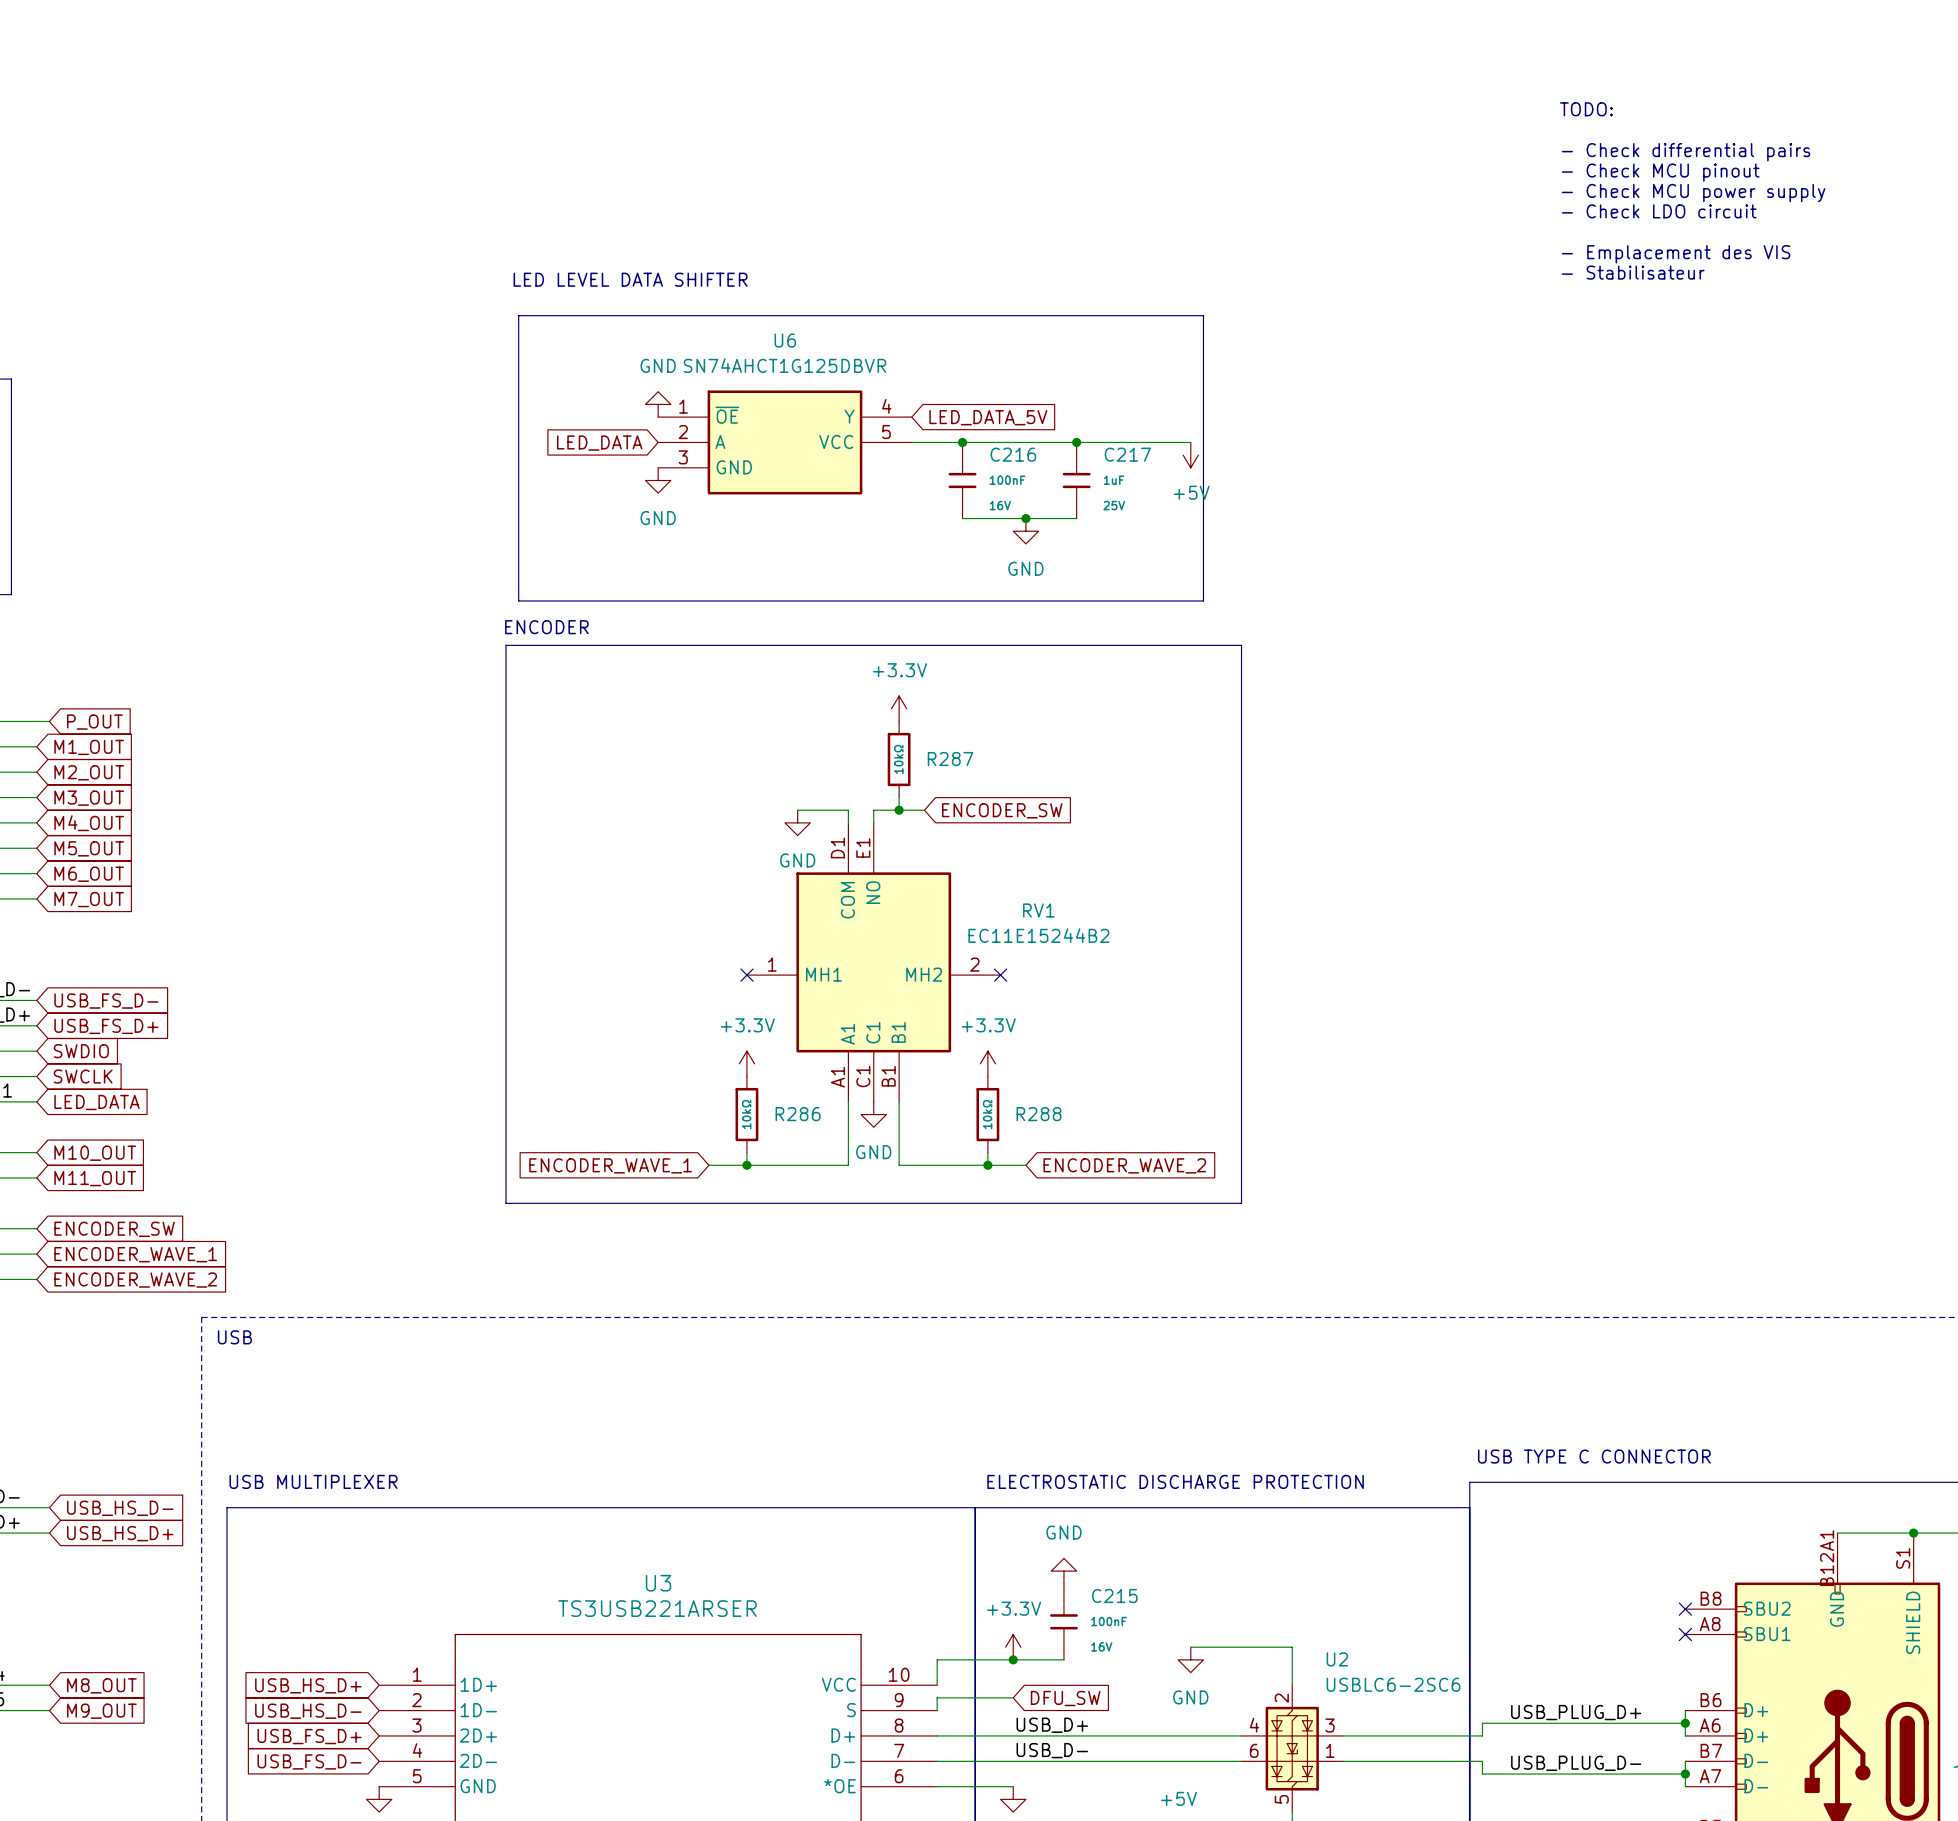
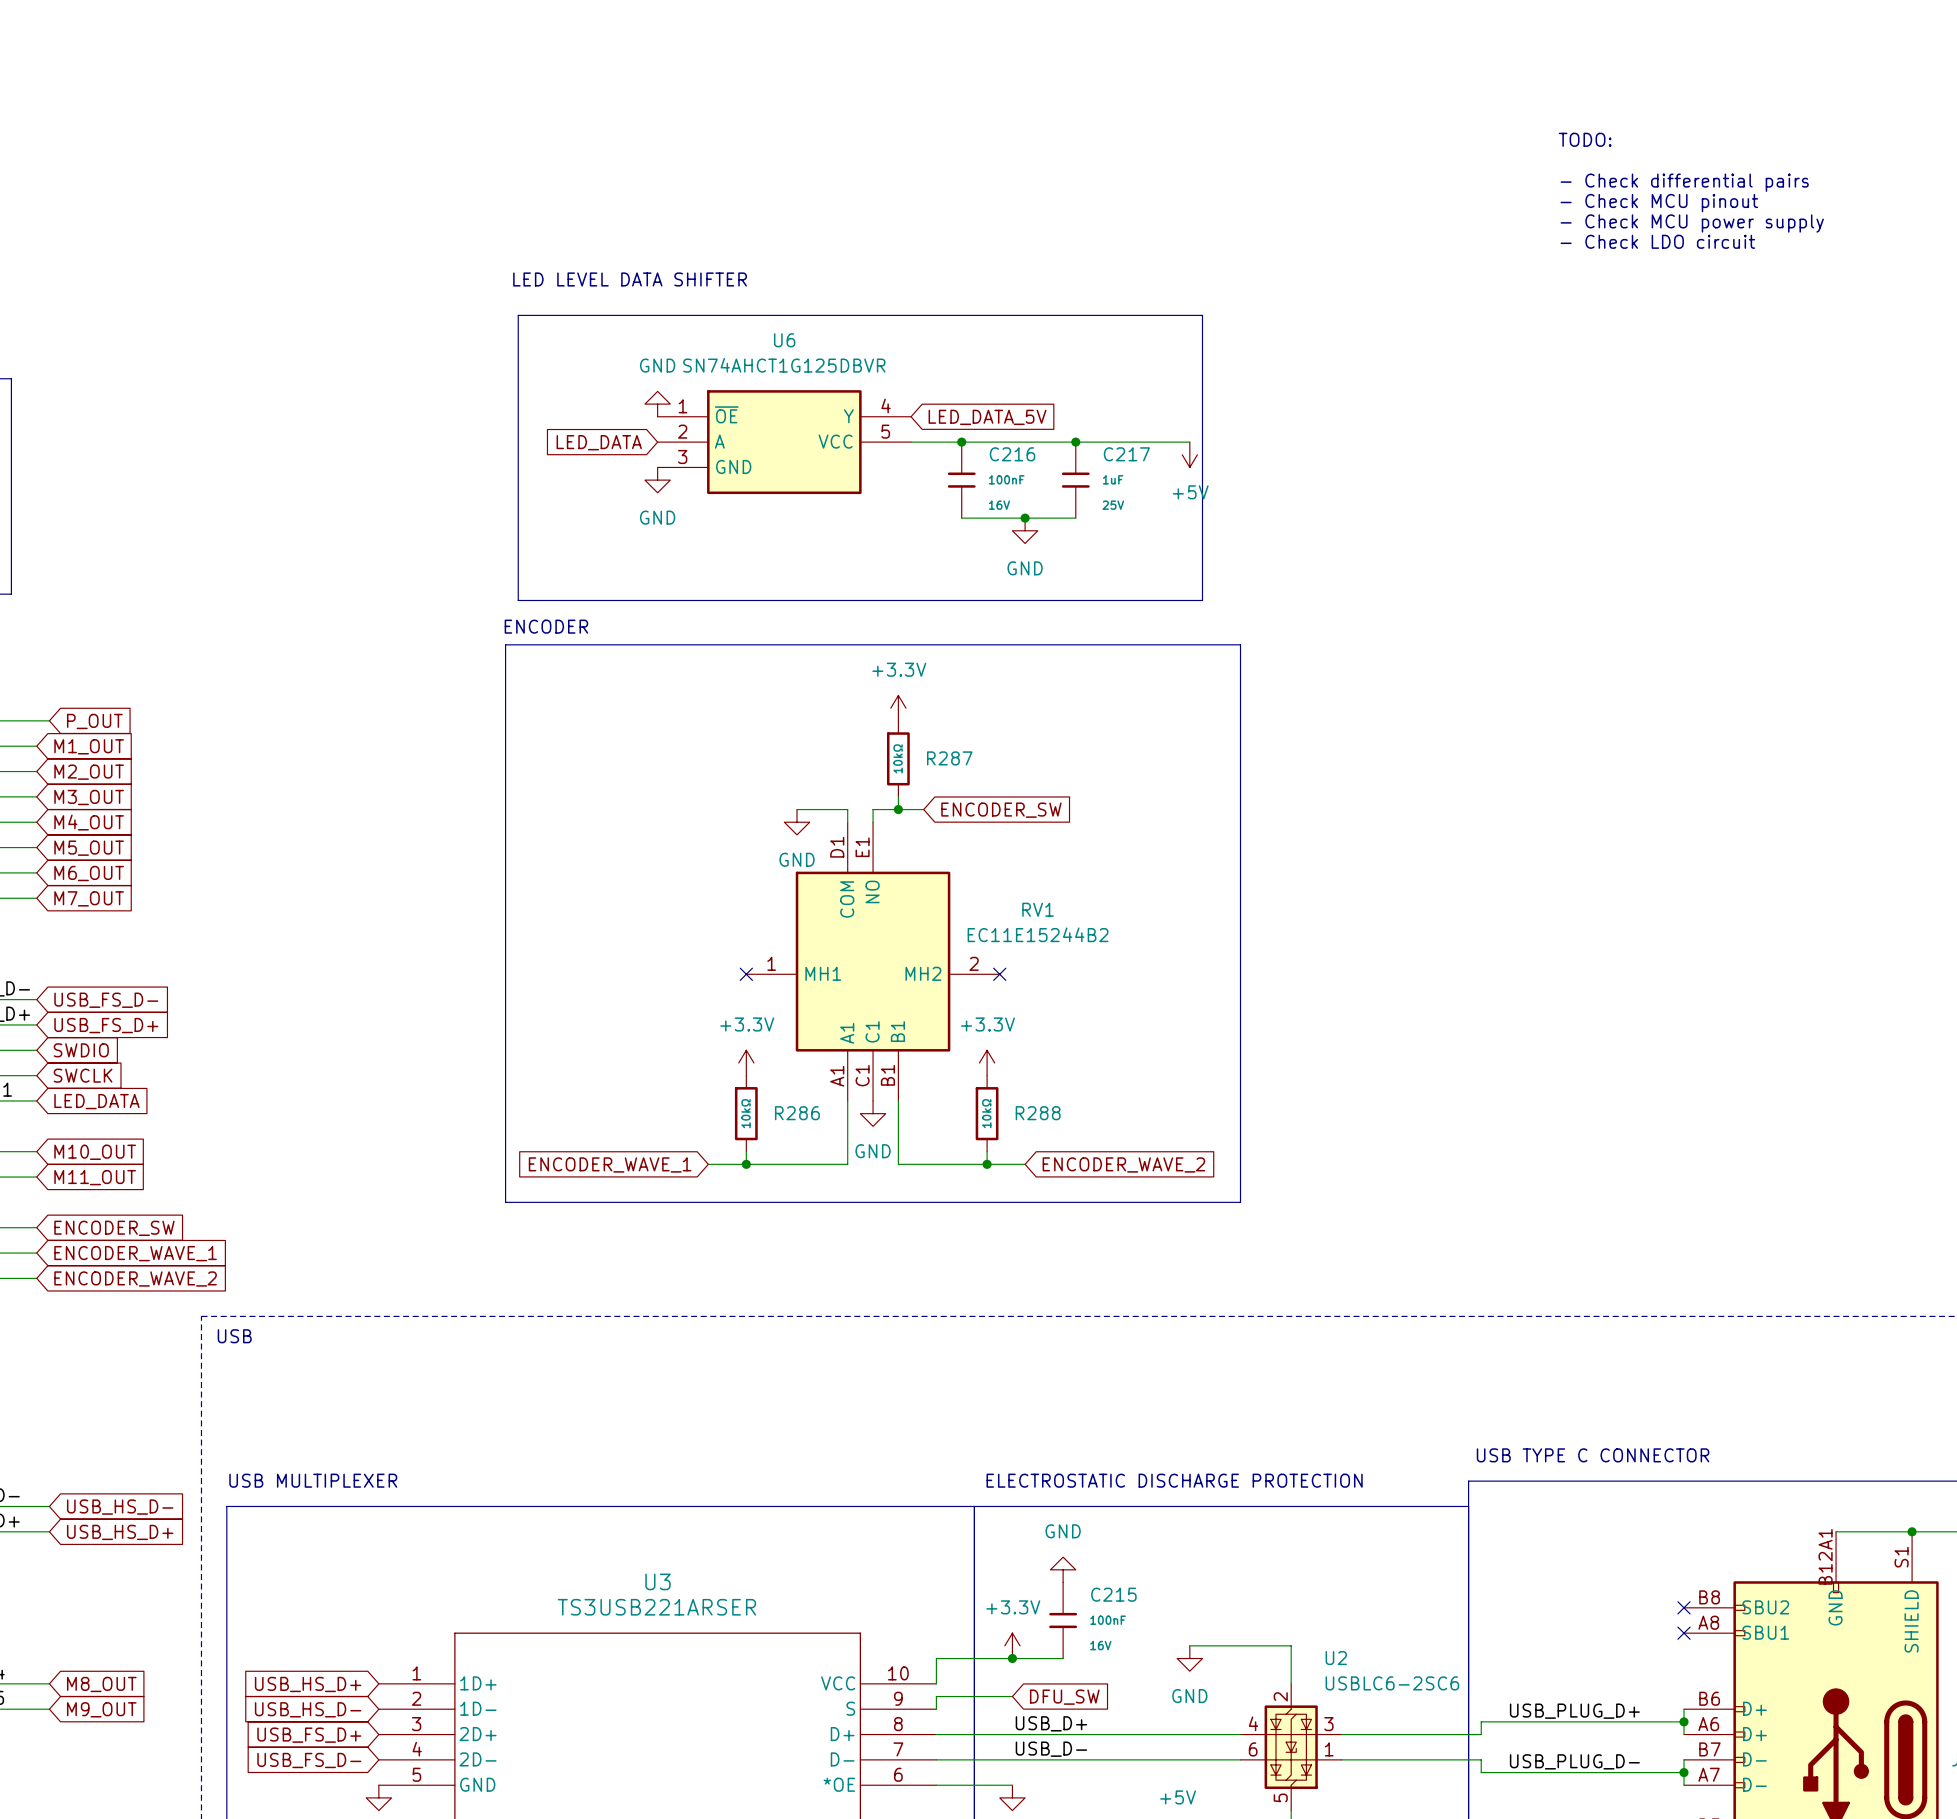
text position: TODO: (1586, 109) -> TODO: (1585, 139)
text position: - Check differential pairs (1686, 152) -> - Check differential pairs (1684, 182)
text position: - Check MCU pinout (1660, 172) -> - Check MCU pinout (1659, 203)
text position: - Check MCU power supply (1693, 193) -> - Check MCU power supply (1692, 223)
text position: - Check LDO circuit (1659, 211) -> - Check LDO circuit (1657, 241)
text: - Emplacement des VIS (1676, 254) -> none
text: - Stabilisateur (1633, 272) -> none

